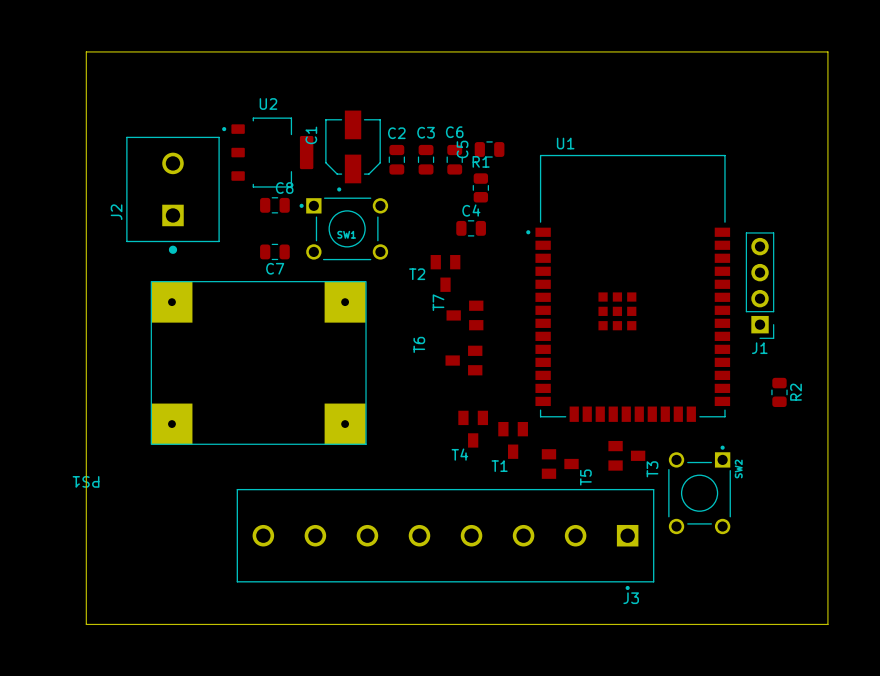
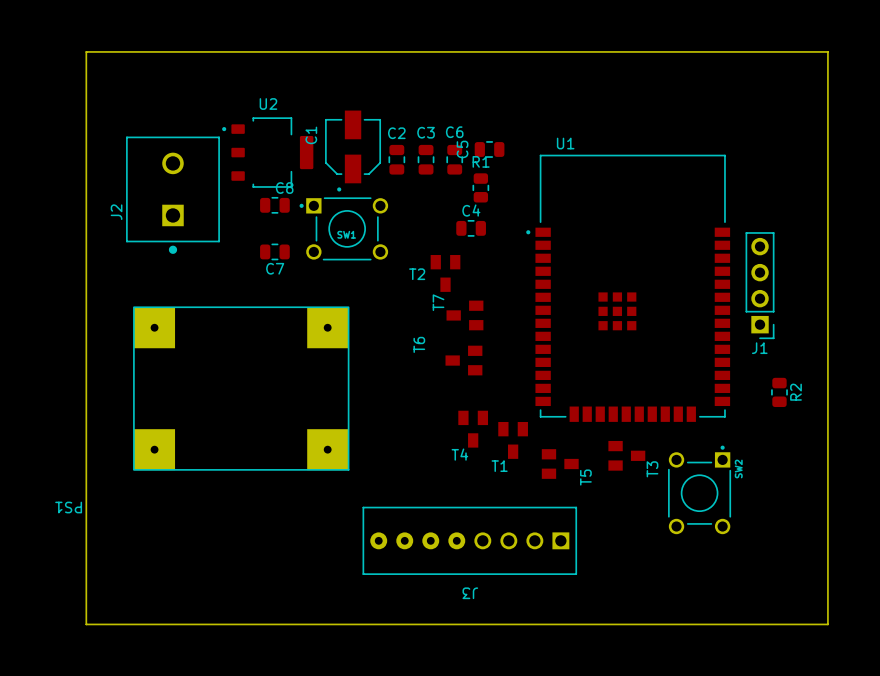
PS1 position: (258, 362) -> (241, 388)
J3 footprint: [236, 488, 655, 591] -> [362, 506, 577, 575]
J3 name position: J3 (631, 598) -> J3 (470, 593)

